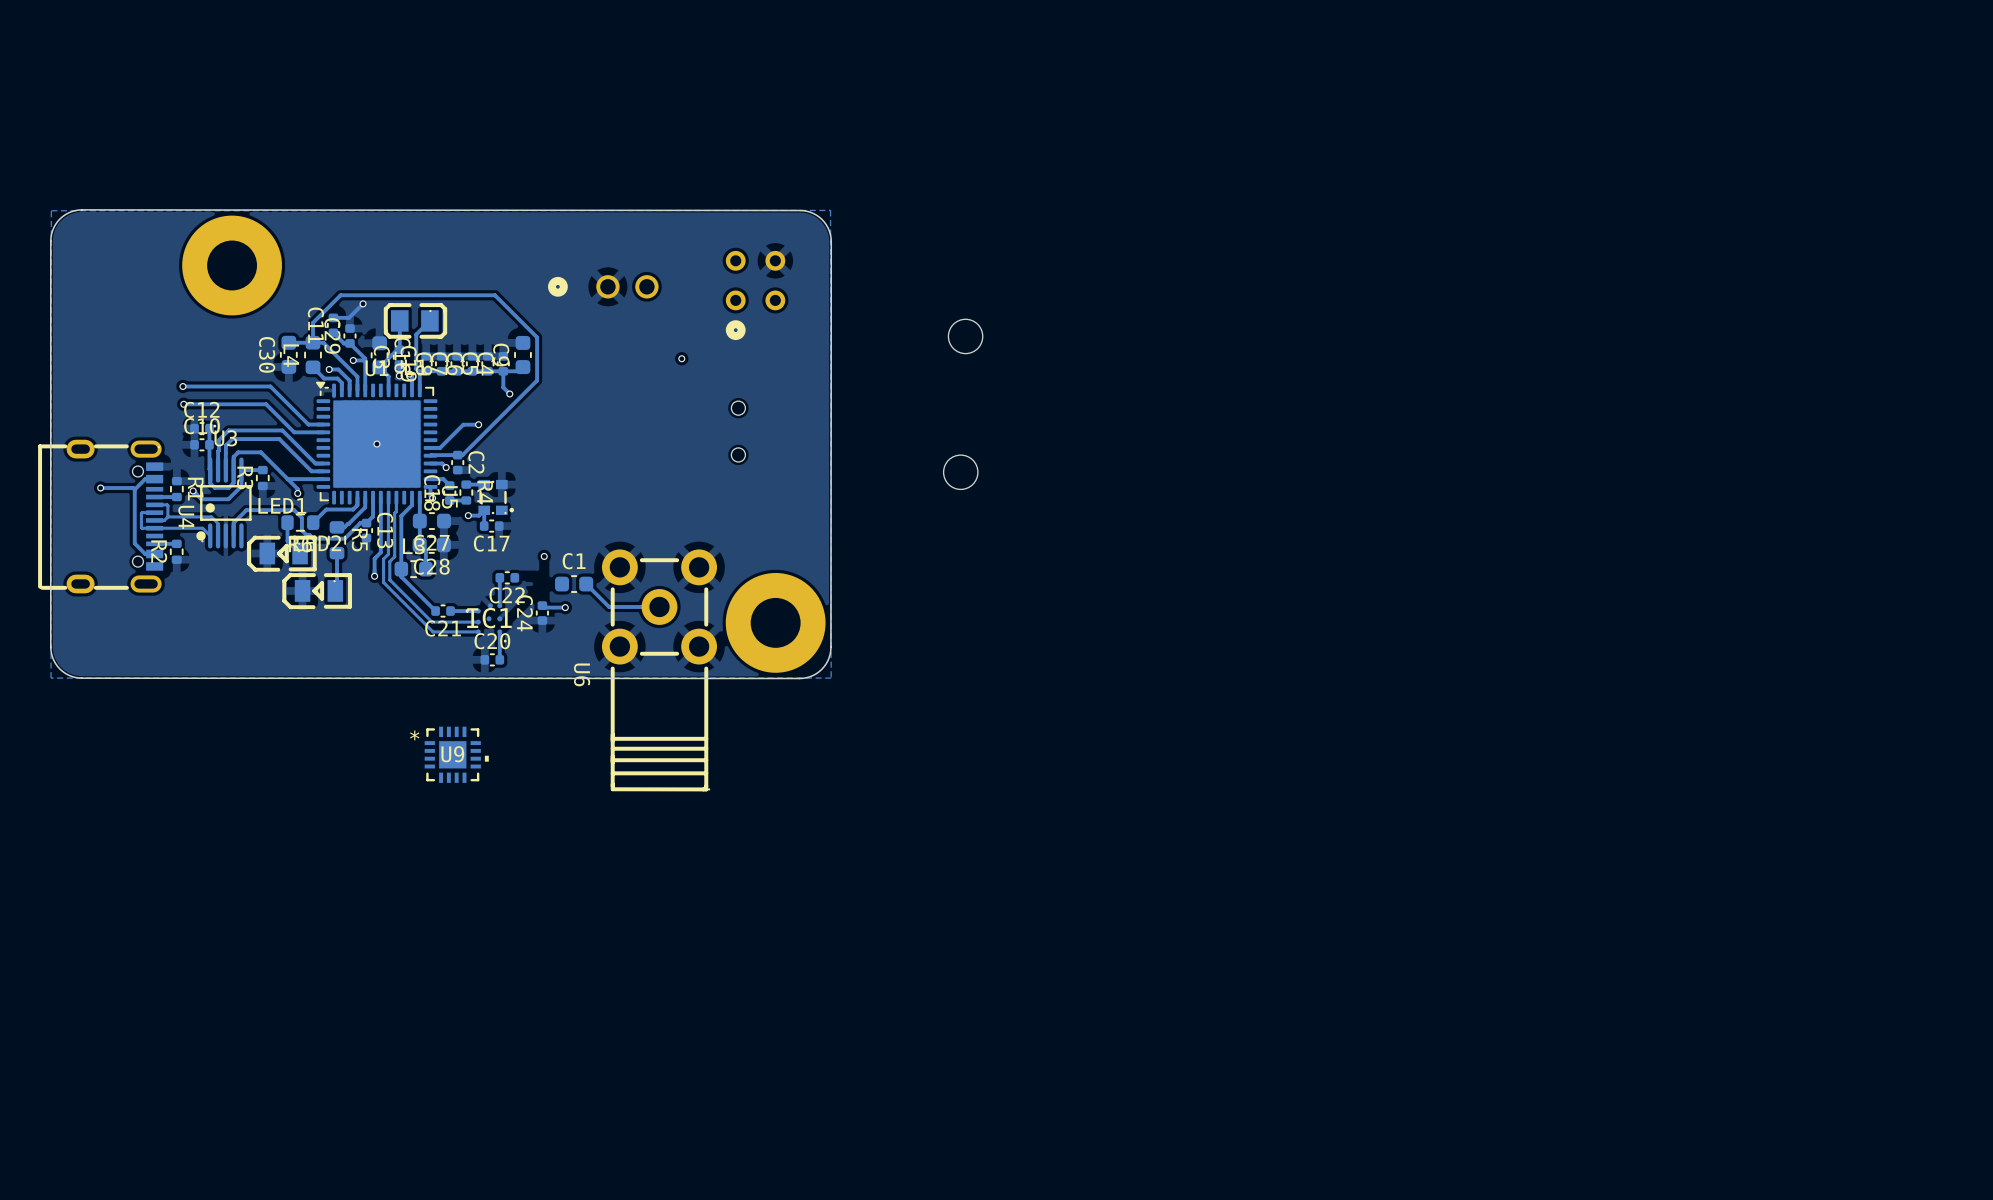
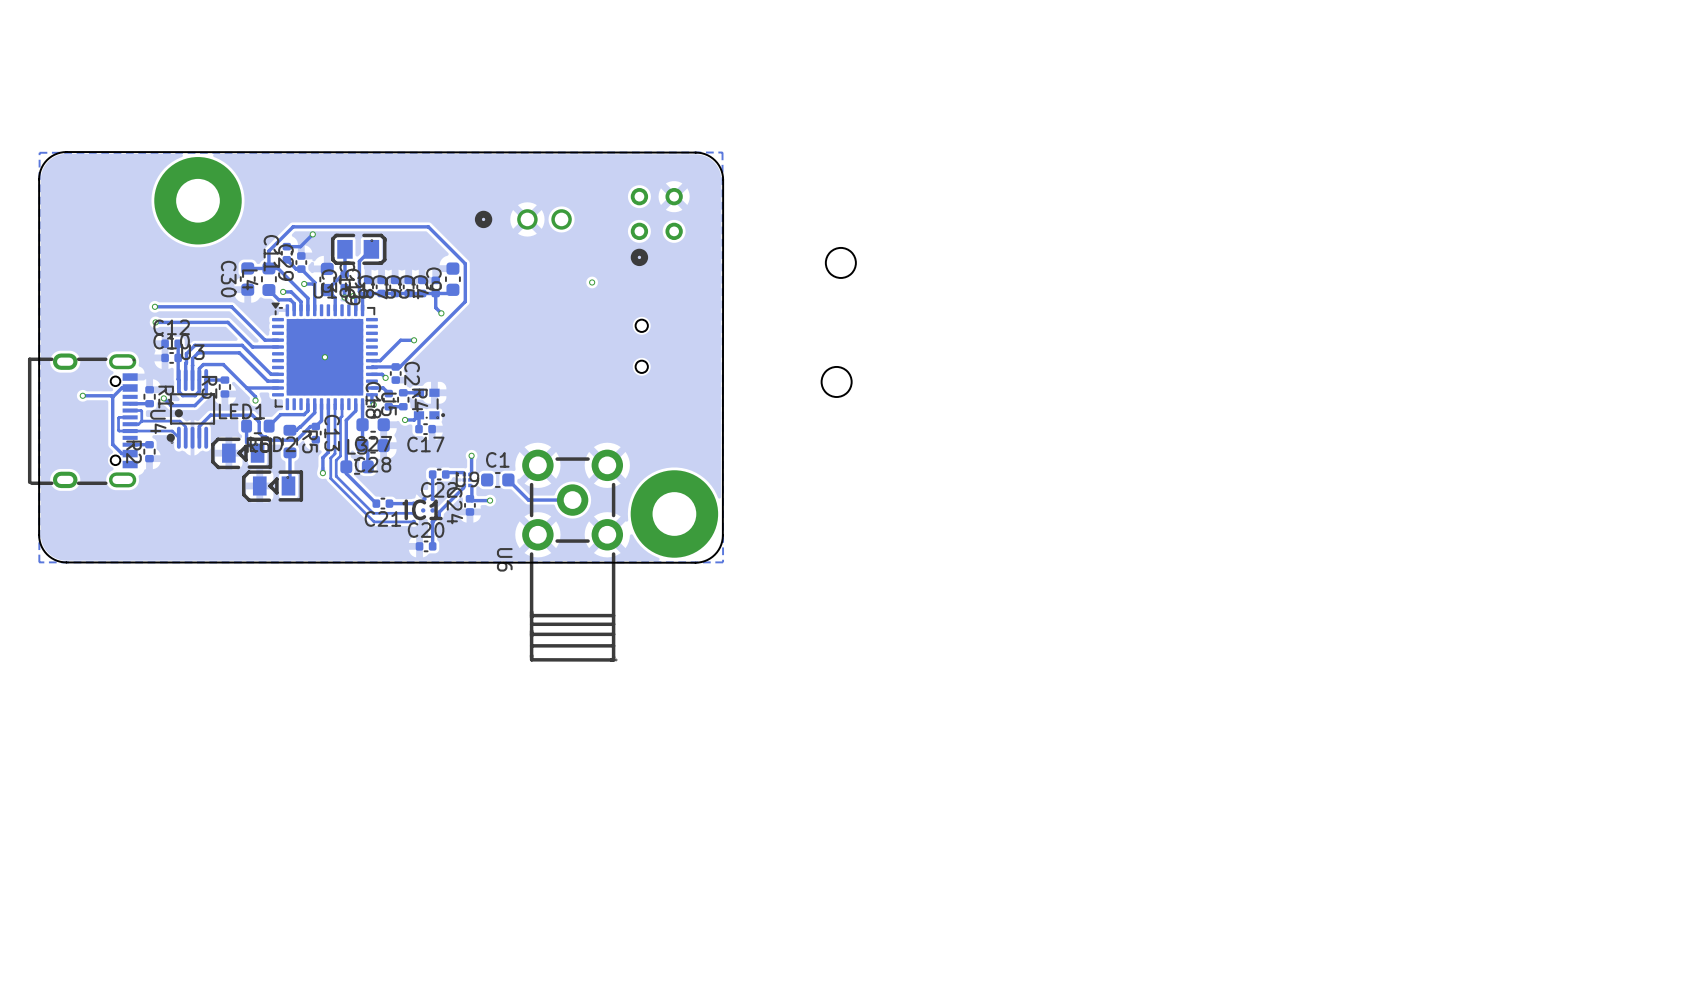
track: none -> (471, 455) (470, 473)
track: none -> (463, 472) (447, 472) (445, 474)
track: none -> (463, 486) (432, 521)
track: none -> (471, 486) (471, 496) (469, 498)
U9 footprint: [424, 726, 489, 783] -> [456, 472, 472, 488]

